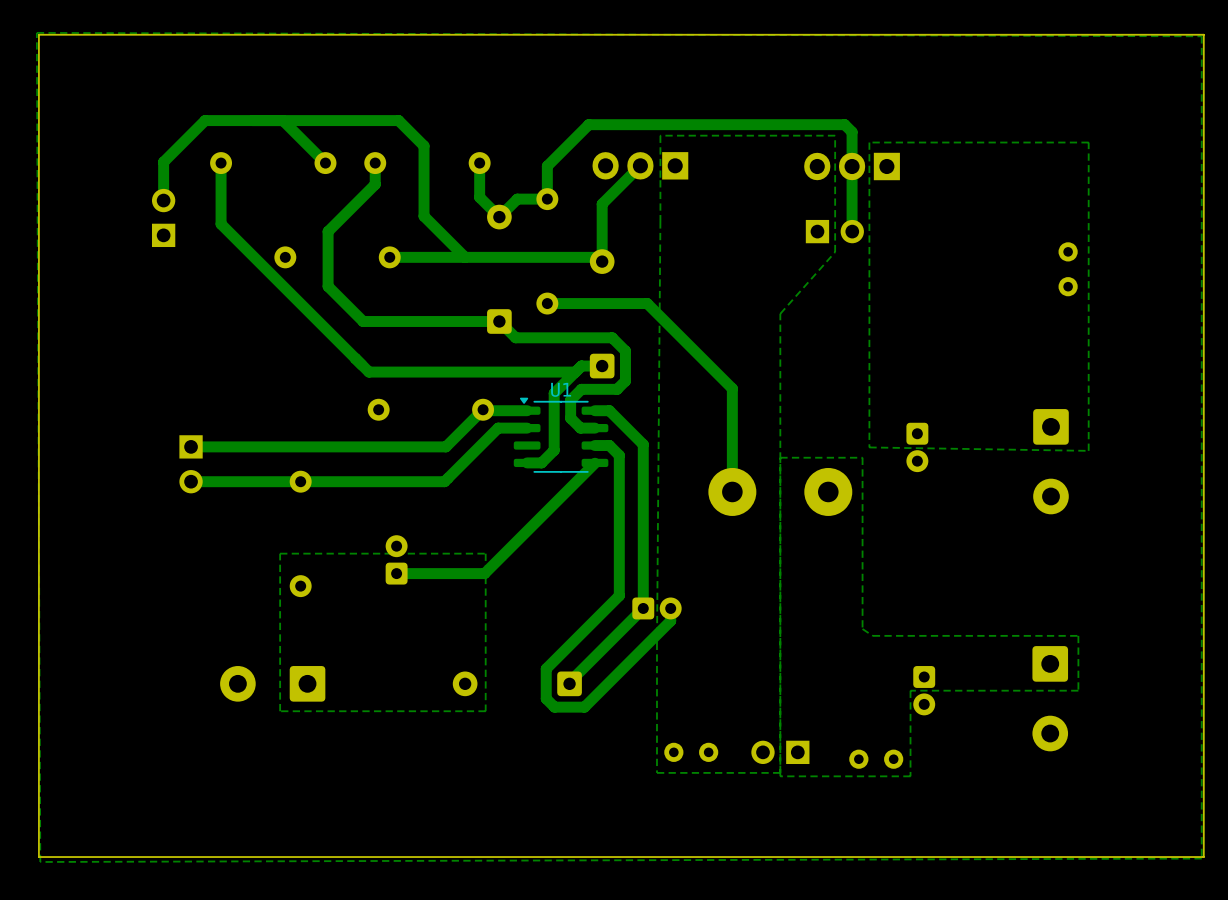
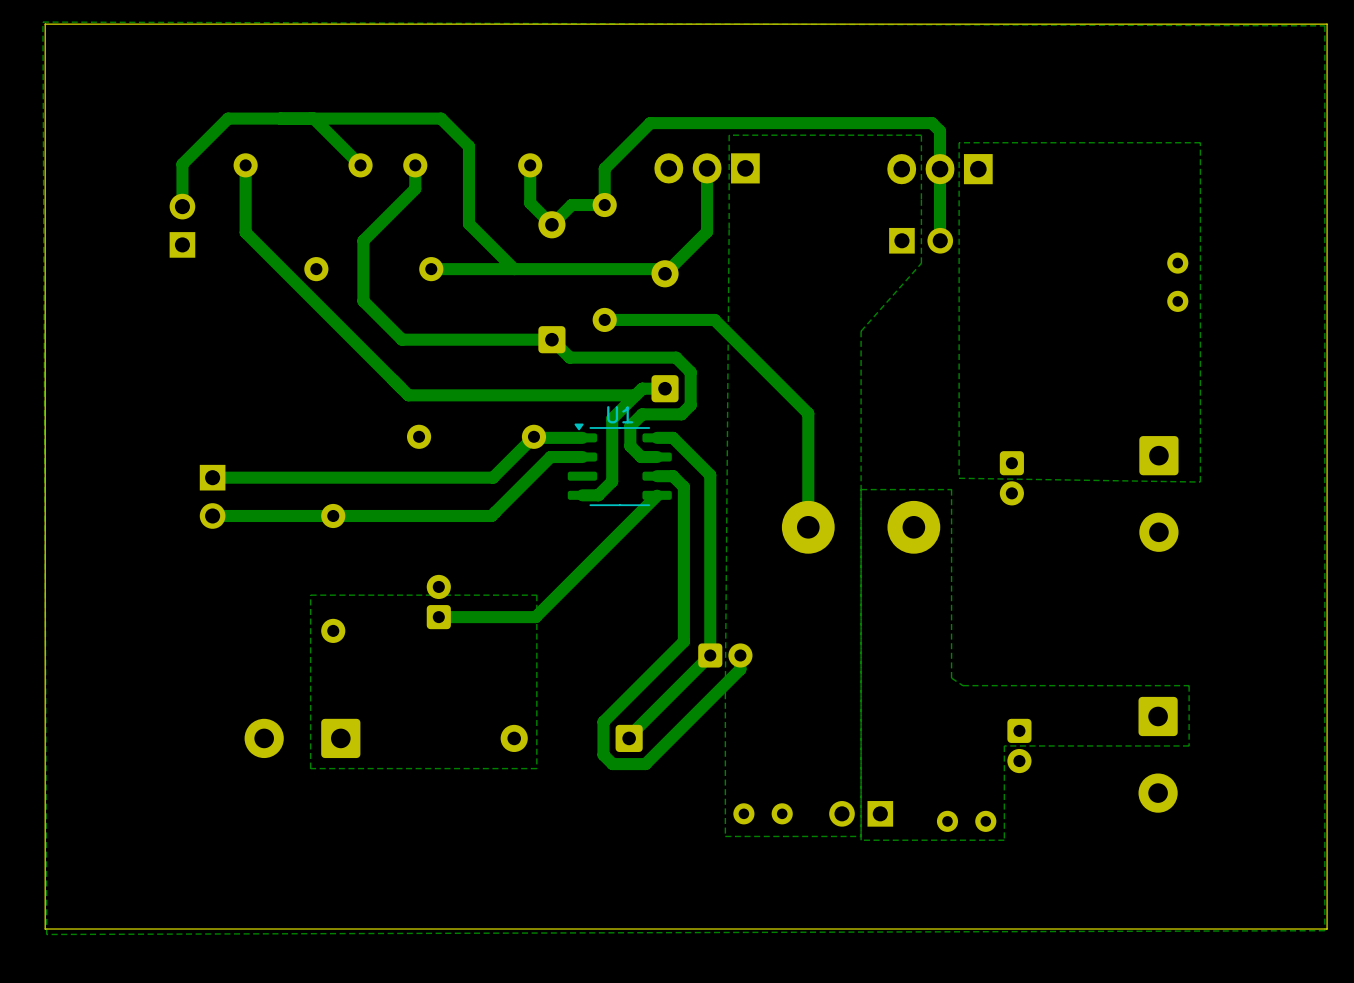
track: (640, 165) (602, 204) (602, 261) -> (707, 168) (707, 231) (665, 273)

